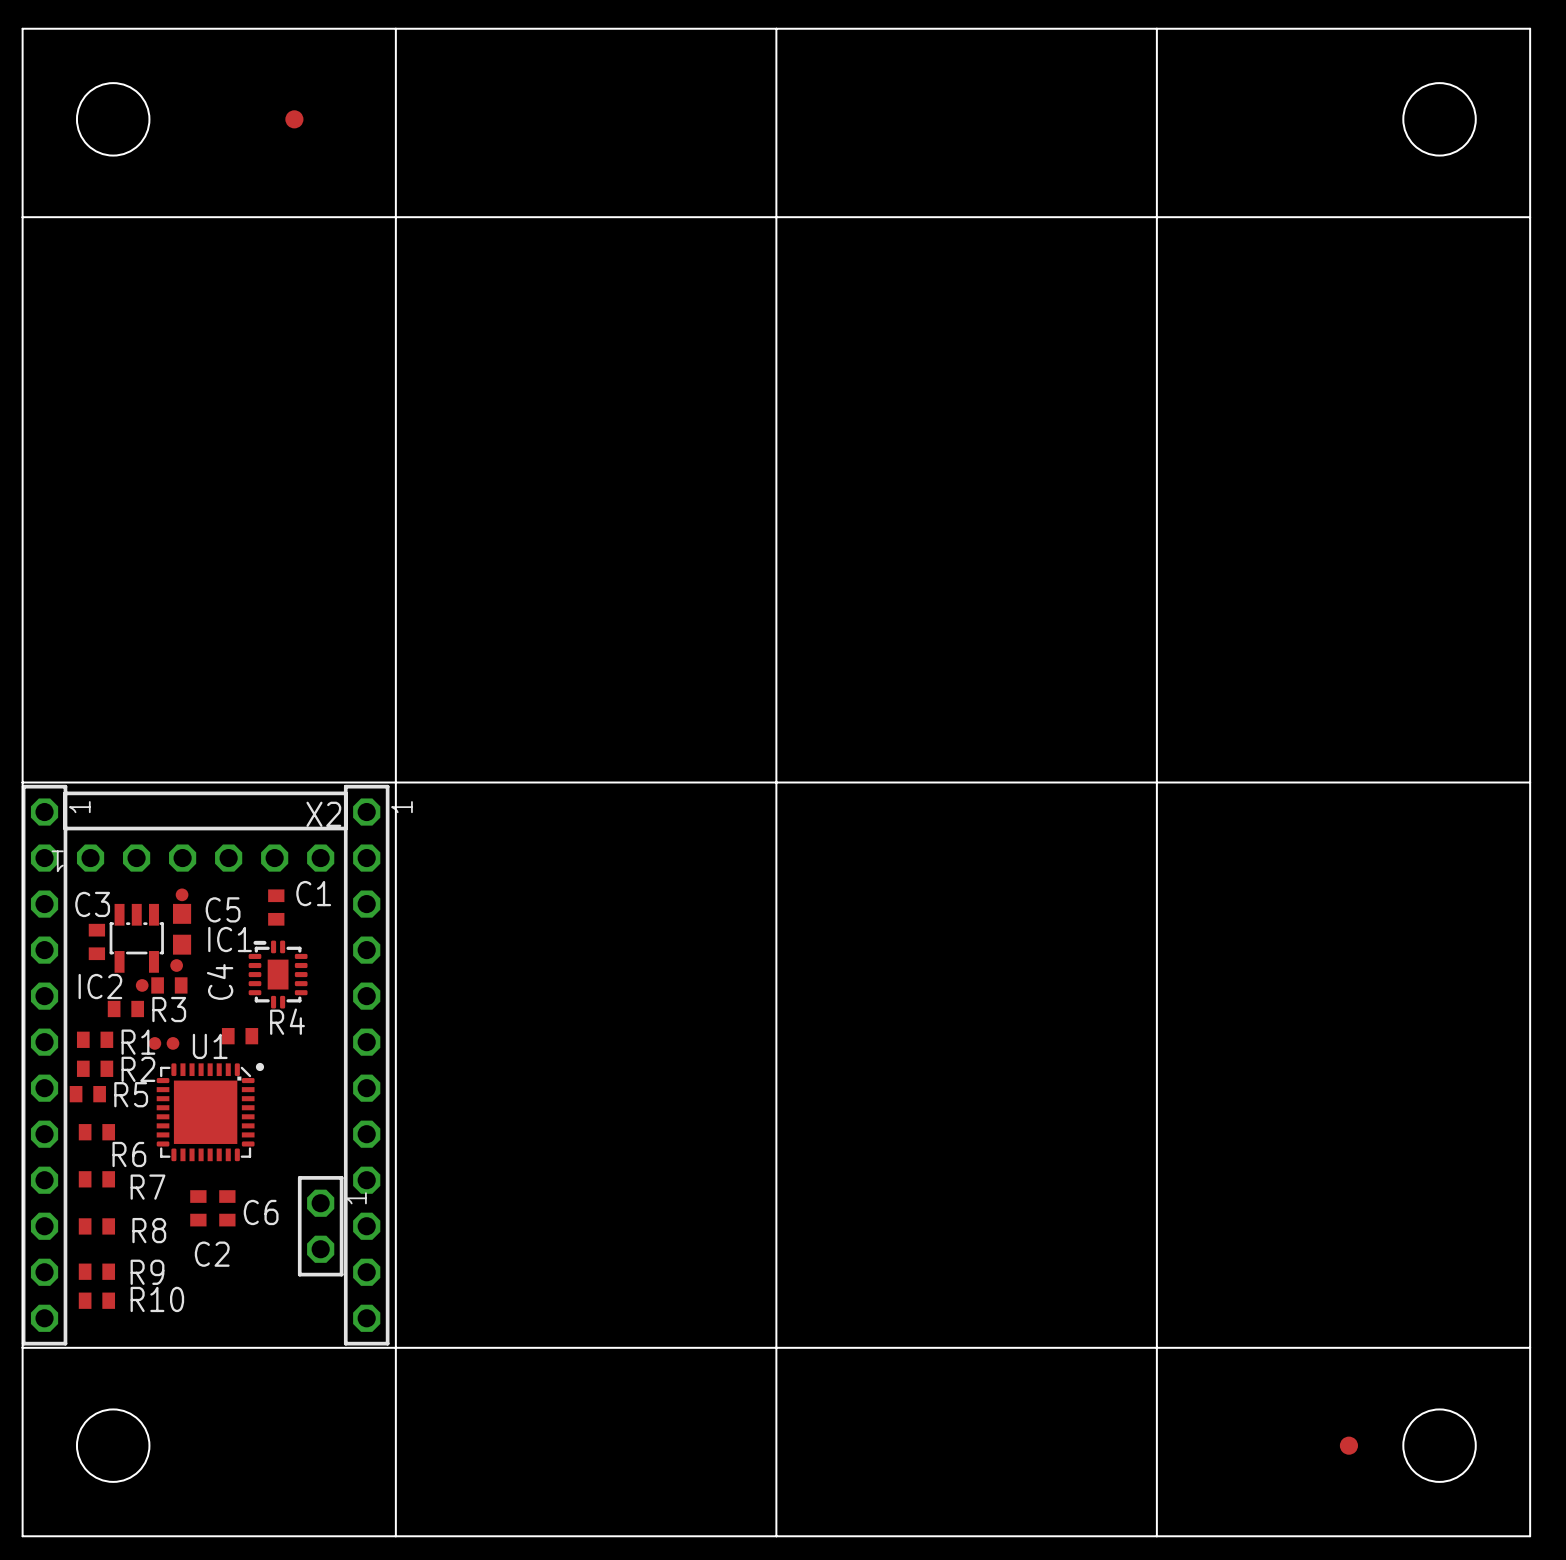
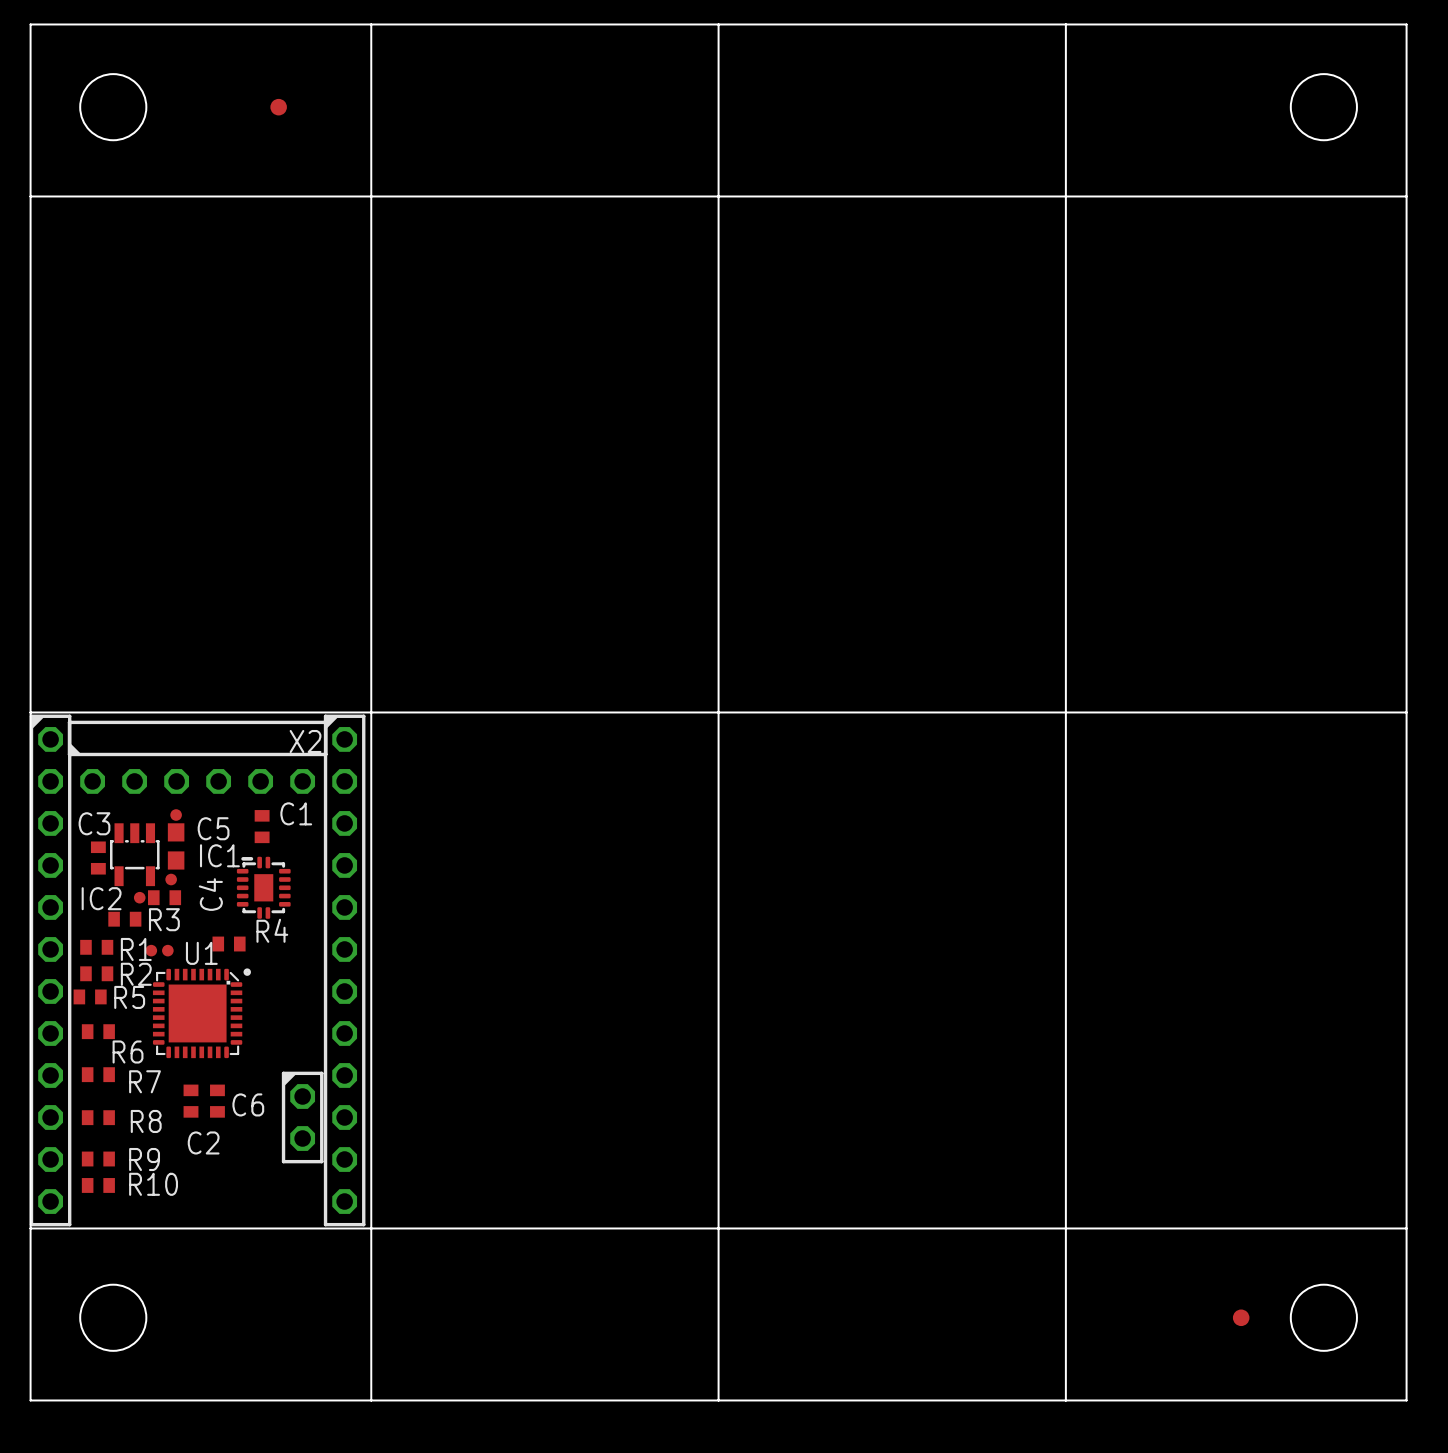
part footprint: [21, 784, 68, 1346] -> [29, 714, 72, 1227]
part footprint: [343, 784, 390, 1346] -> [323, 714, 366, 1227]
X2 footprint: [63, 791, 348, 872] -> [67, 720, 328, 794]
part footprint: [297, 1176, 344, 1277] -> [281, 1071, 324, 1164]

